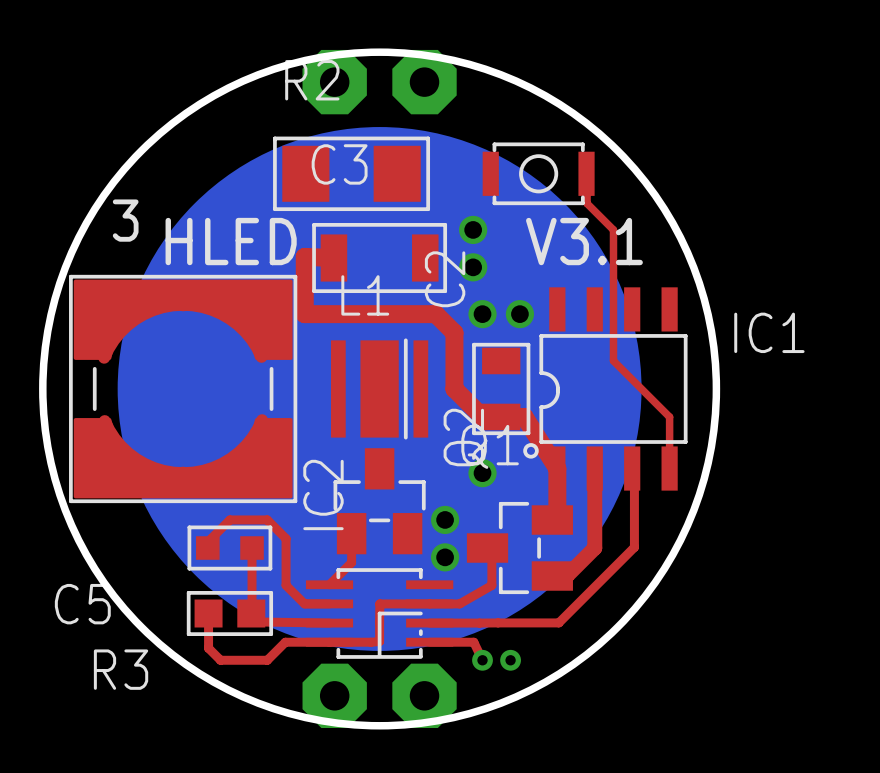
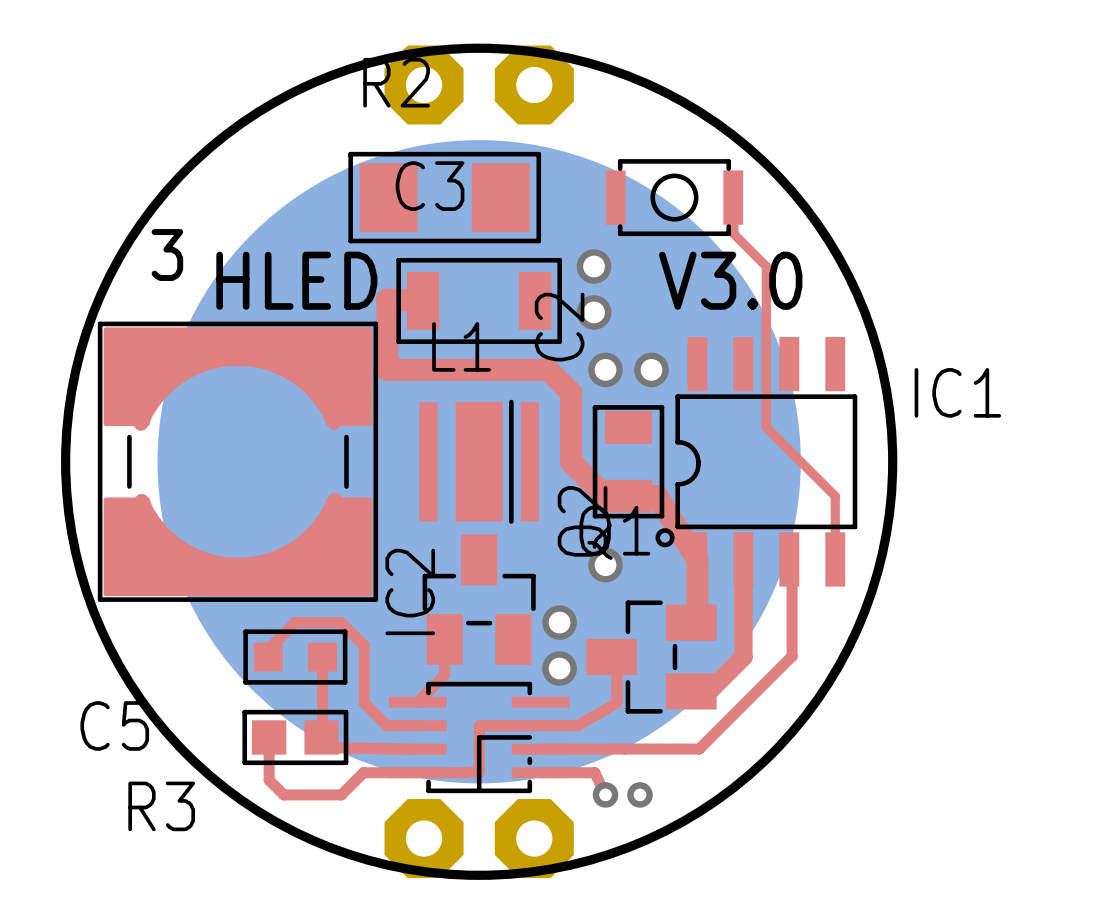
text: V3.1 (584, 241) -> V3.0 (730, 280)

